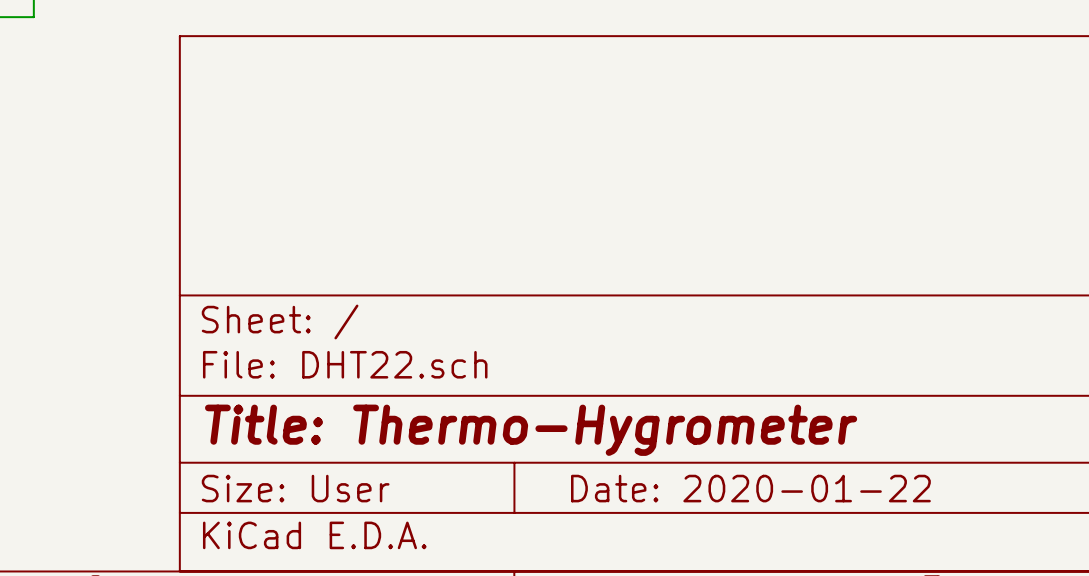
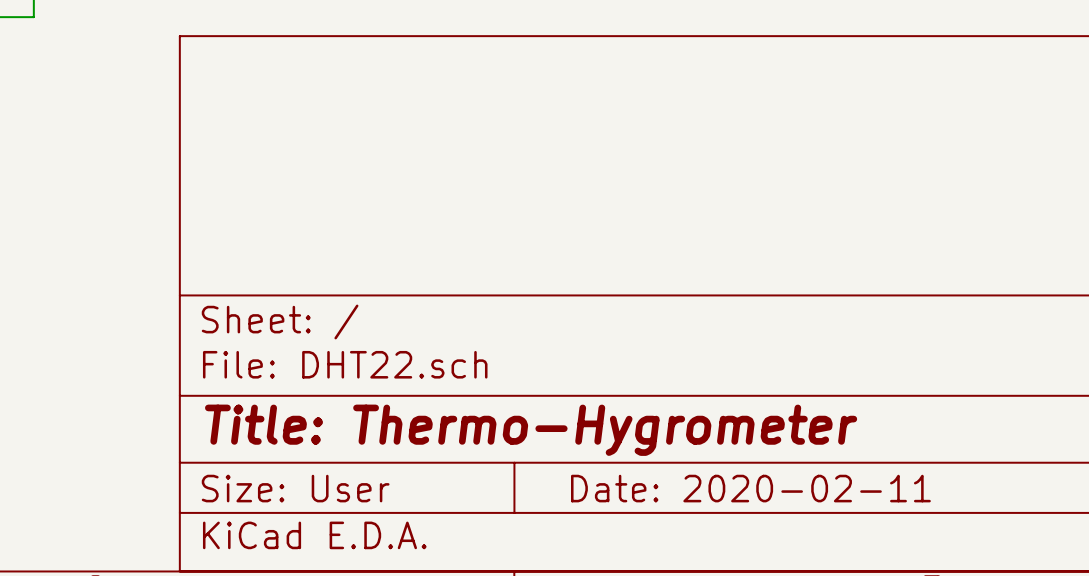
title block: Date: 2020-01-22 (750, 488) -> Date: 2020-02-11 (750, 488)

